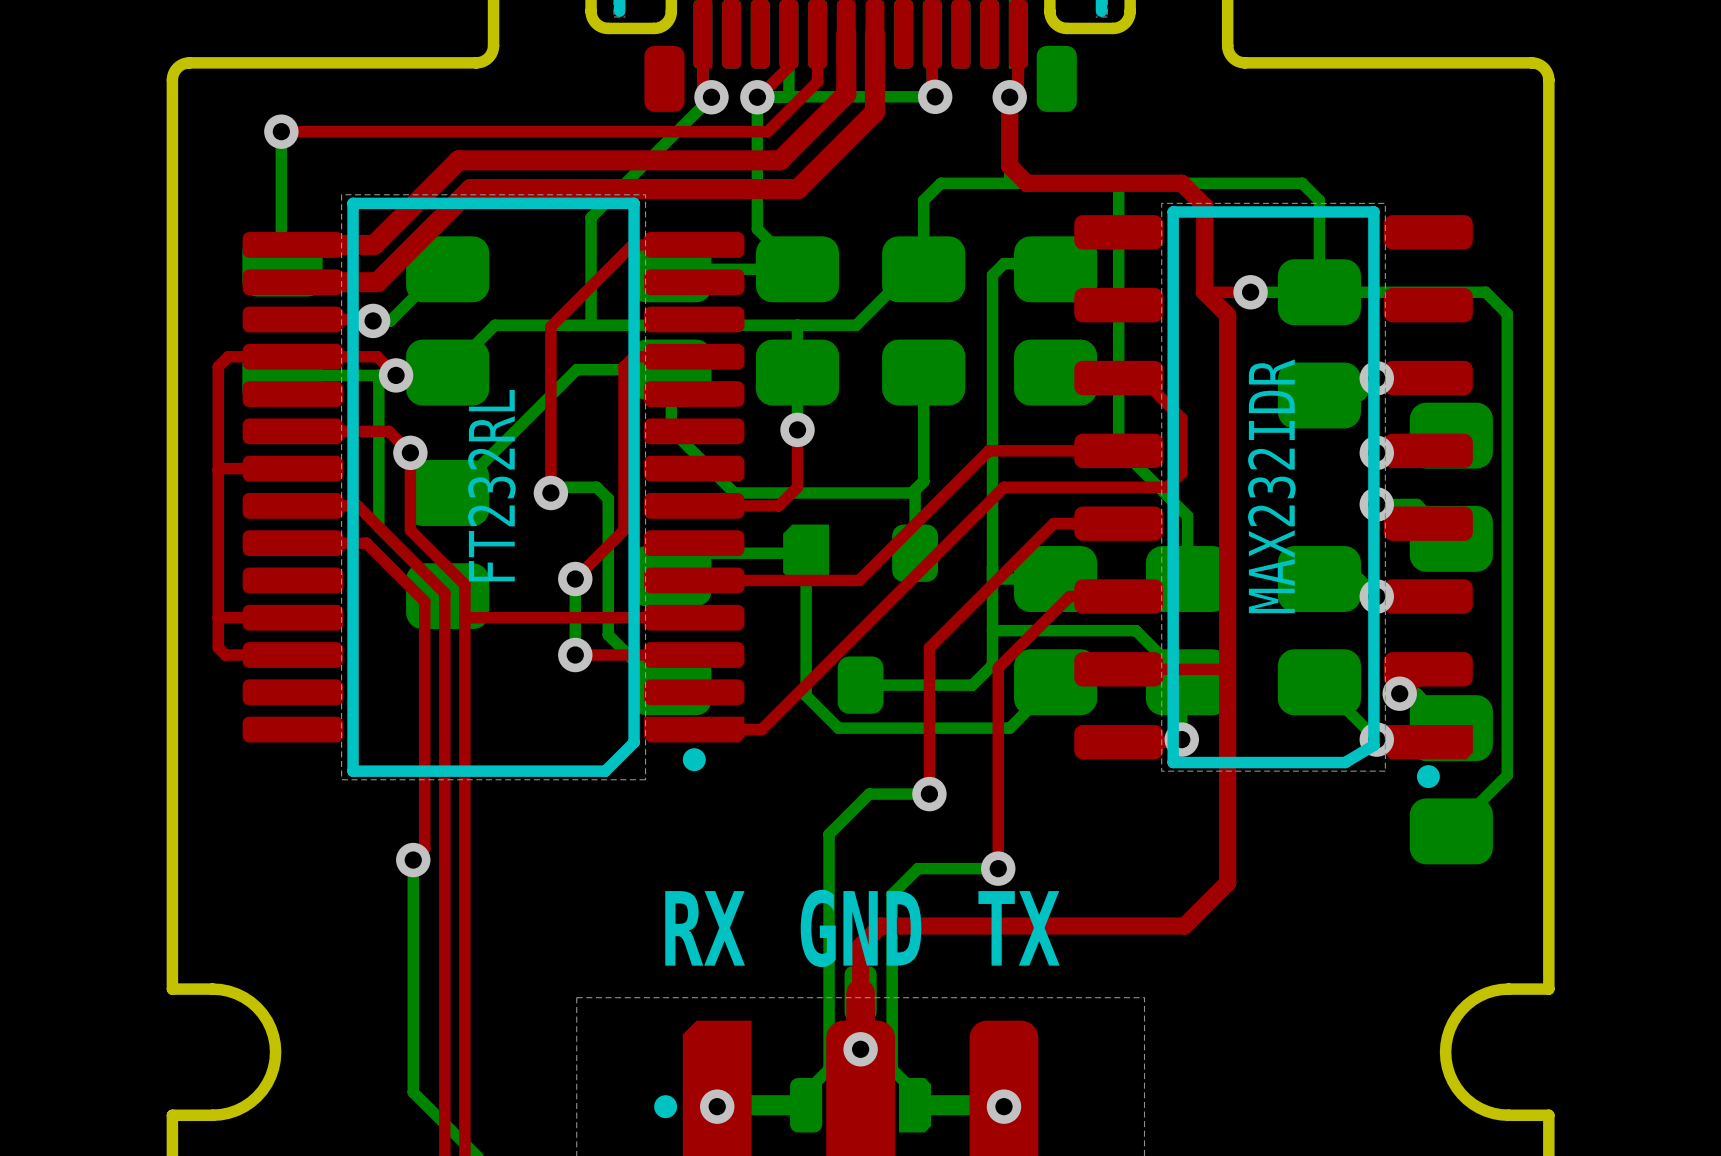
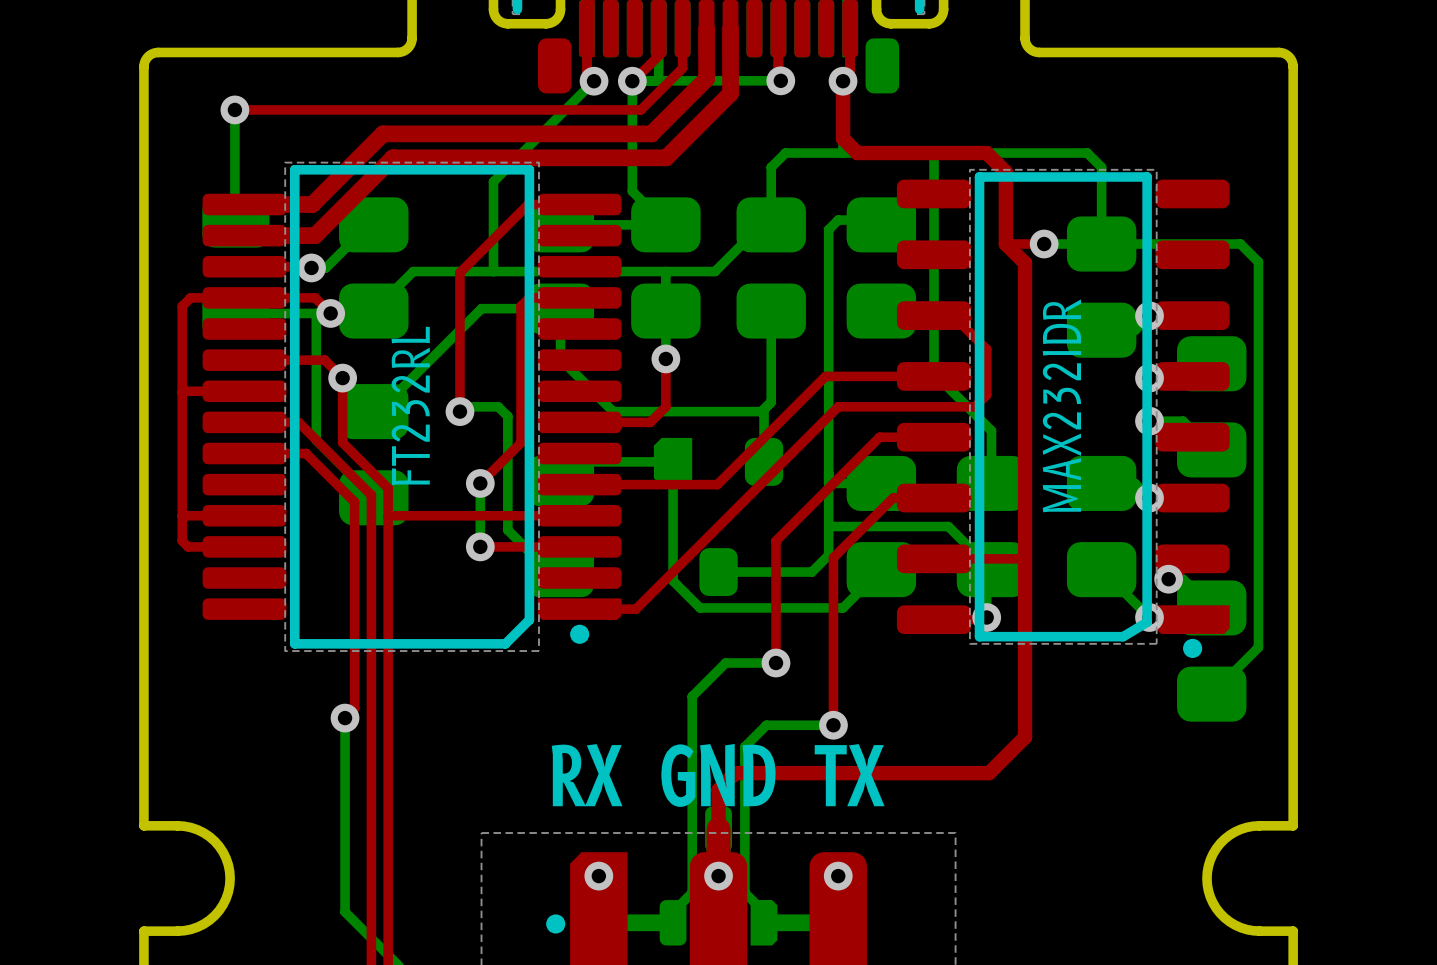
via position: (717, 1106) -> (598, 876)
via position: (1003, 1106) -> (838, 876)

